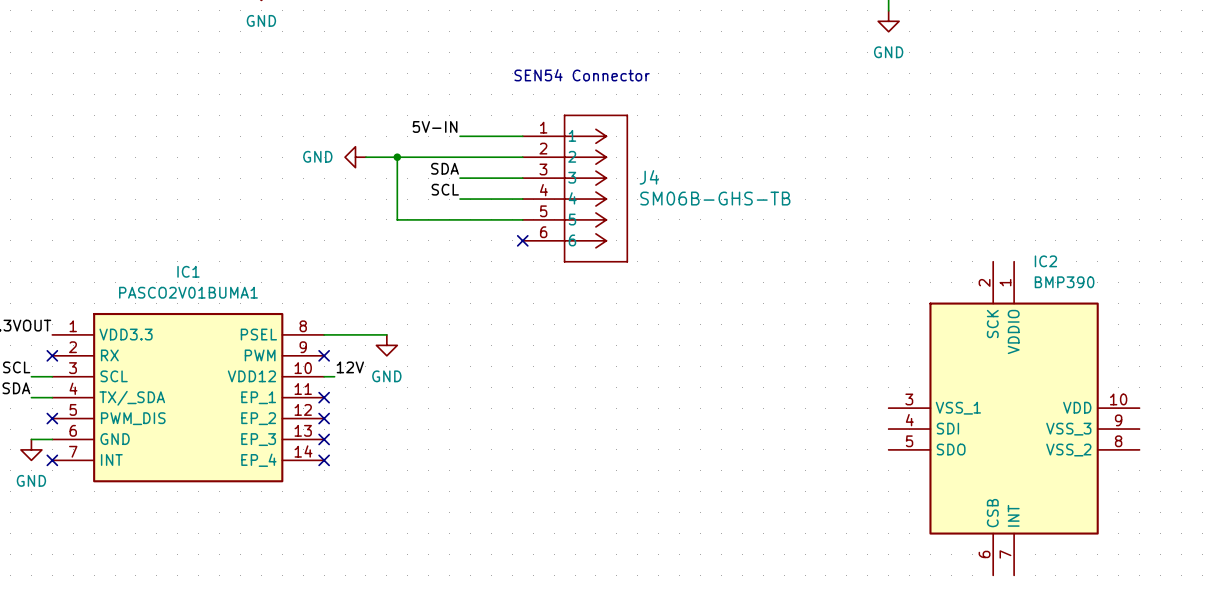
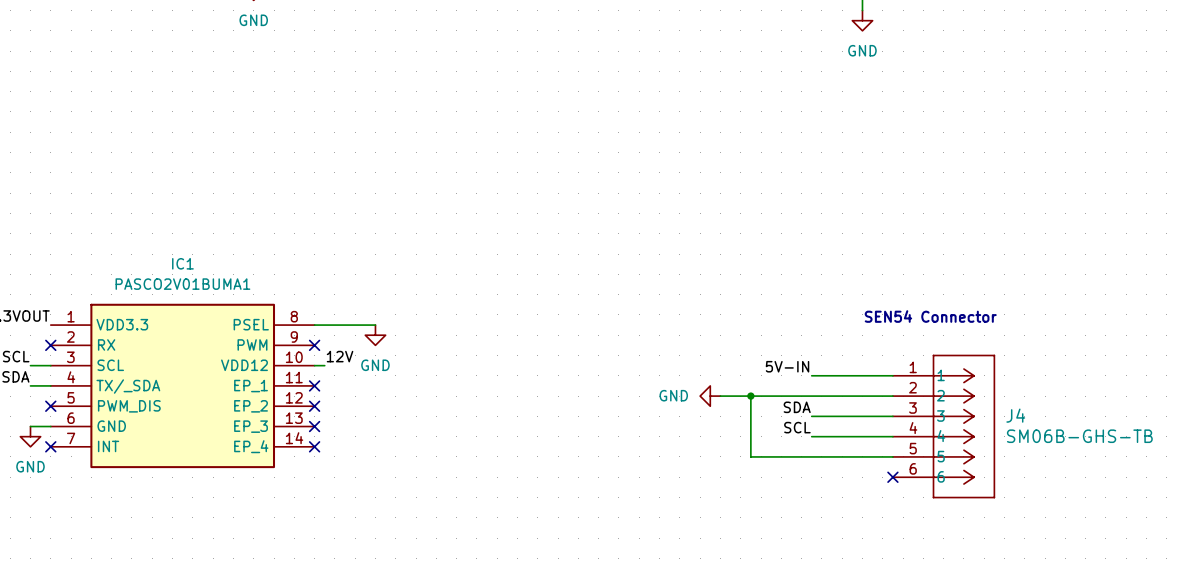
text: SEN54 Connector (582, 75) -> none
label: 5V-IN (435, 126) -> none
wire: (460, 136) (522, 136) -> none
power symbol: GND (355, 157) -> none
wire: (365, 157) (522, 157) -> none
wire: (397, 157) (397, 219) (522, 219) -> none
junction: (397, 157) -> none
label: SDA (445, 168) -> none
wire: (460, 178) (522, 178) -> none
J4 position: (575, 188) -> (943, 426)
label: SCL (445, 189) -> none
wire: (460, 199) (522, 199) -> none
no-connect mark: (522, 240) -> none
text: none -> SEN54 Connector (930, 316)
label: none -> 5V-IN (787, 366)
wire: none -> (811, 375) (892, 375)
power symbol: none -> GND (710, 396)
wire: none -> (720, 396) (892, 396)
wire: none -> (750, 396) (750, 456) (892, 456)
junction: none -> (750, 396)
IC2: BMP390 (1014, 418) -> none
label: none -> SDA (797, 407)
wire: none -> (811, 416) (892, 416)
label: none -> SCL (797, 427)
wire: none -> (811, 436) (892, 436)
no-connect mark: none -> (892, 477)

